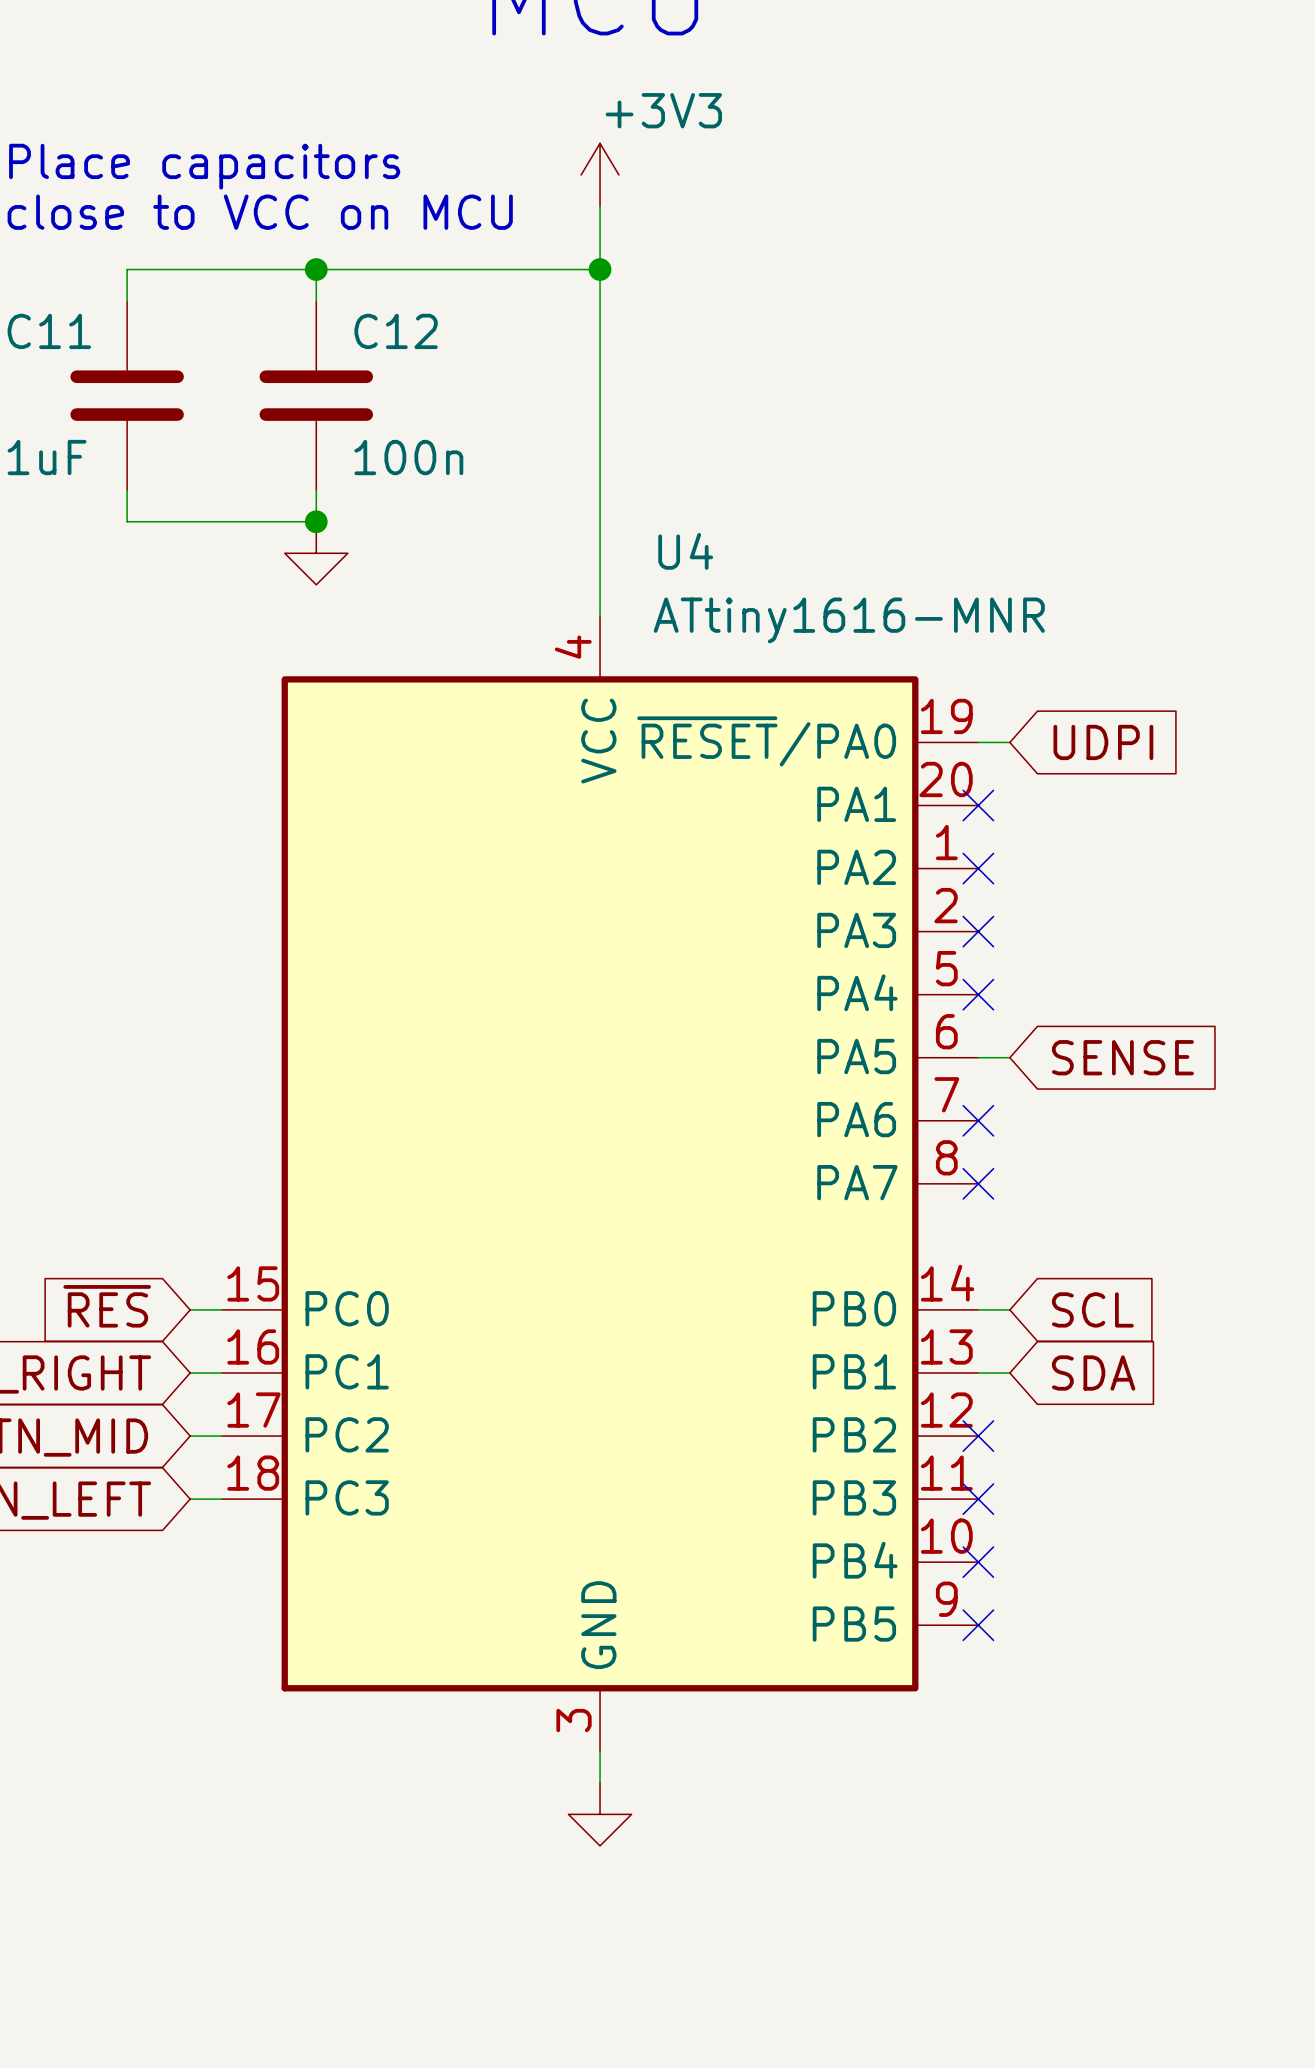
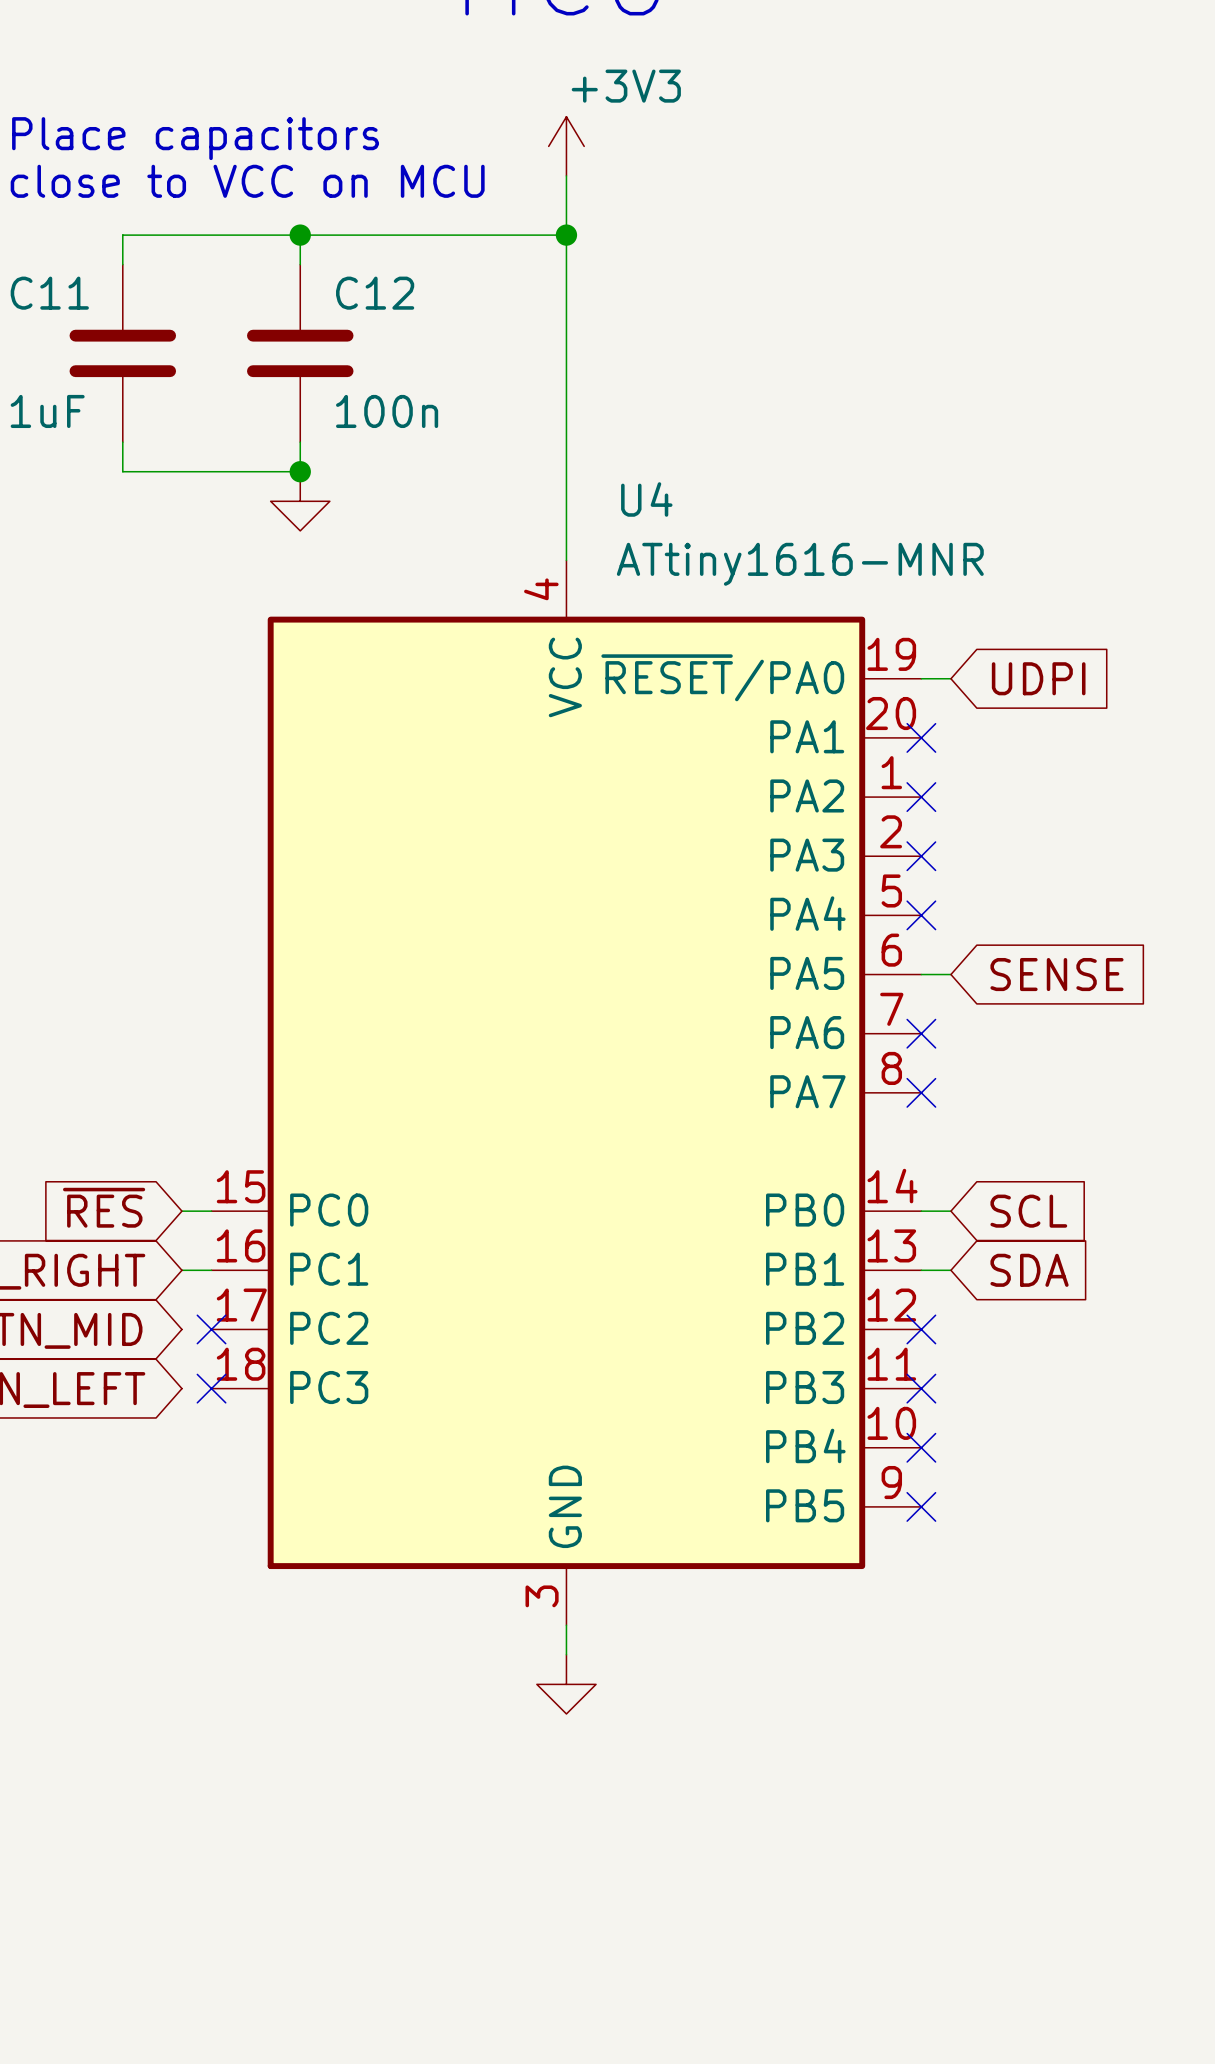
wire: (190, 1436) (221, 1436) -> none
no-connect mark: none -> (211, 1329)
wire: (190, 1499) (221, 1499) -> none
no-connect mark: none -> (211, 1388)

